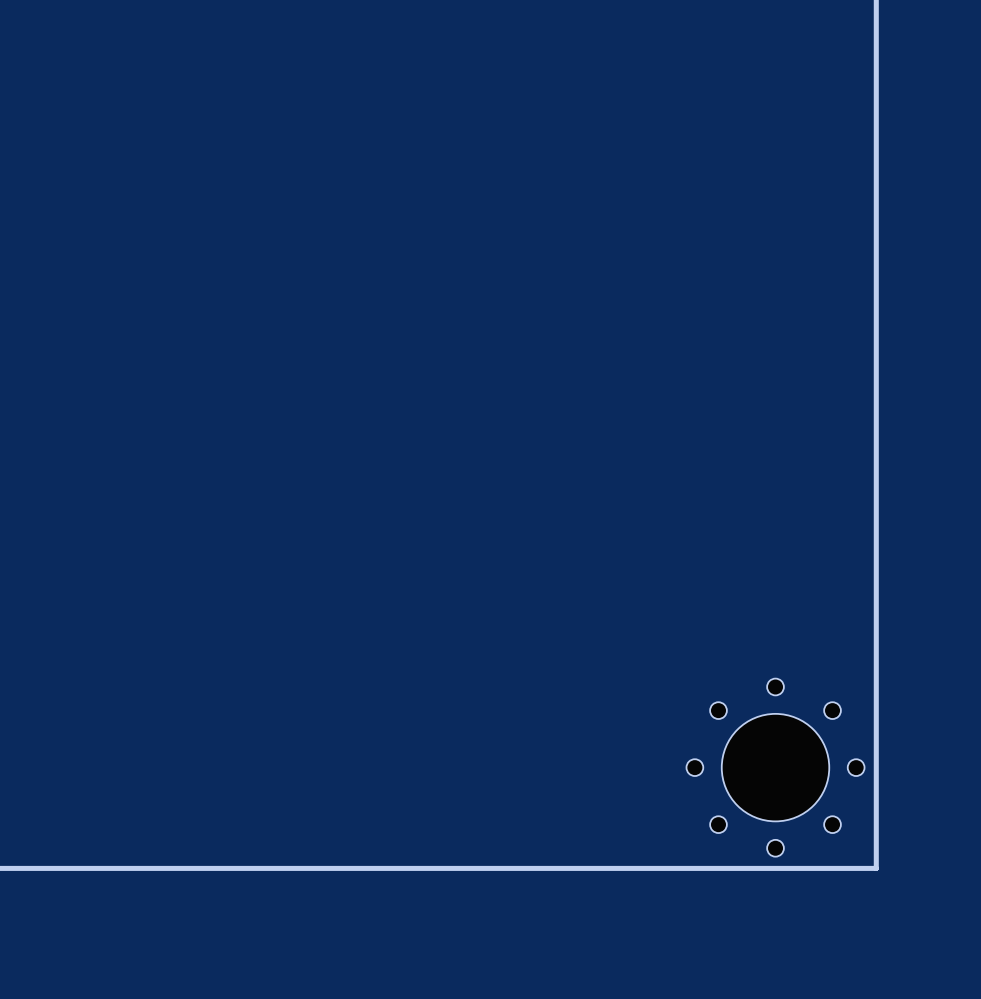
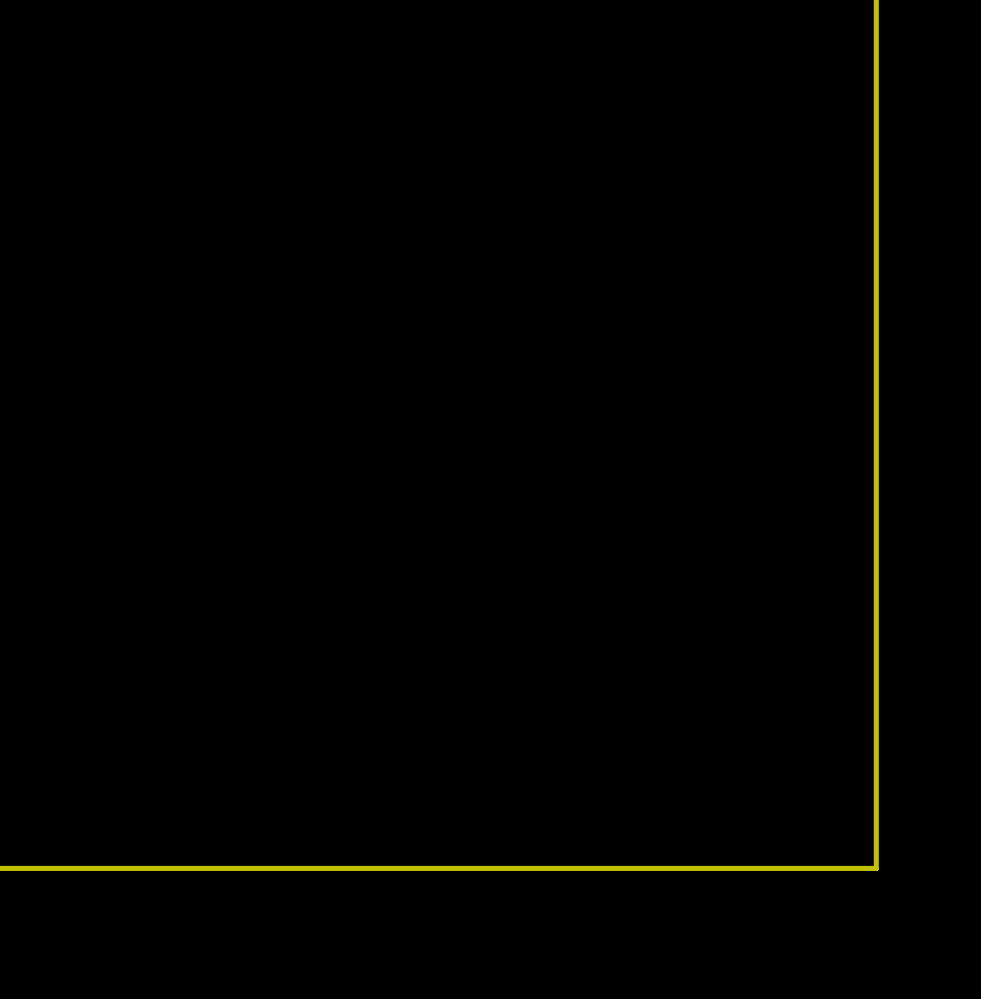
part: (775, 767) -> none

